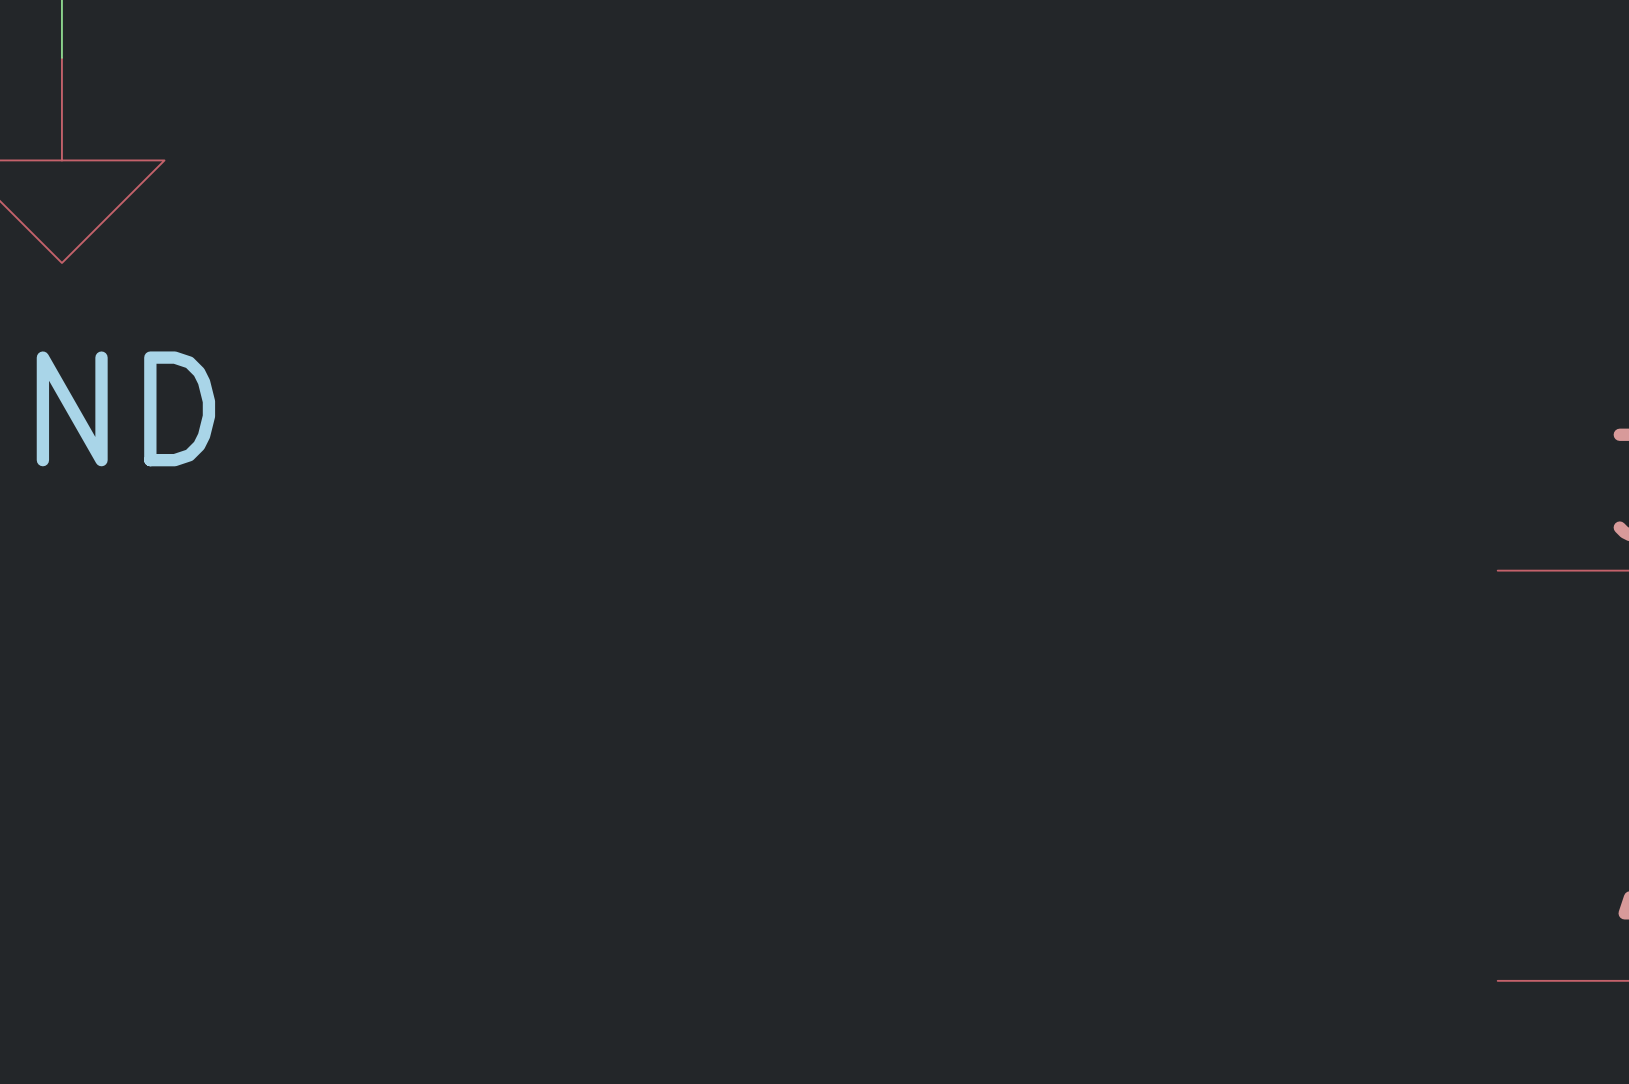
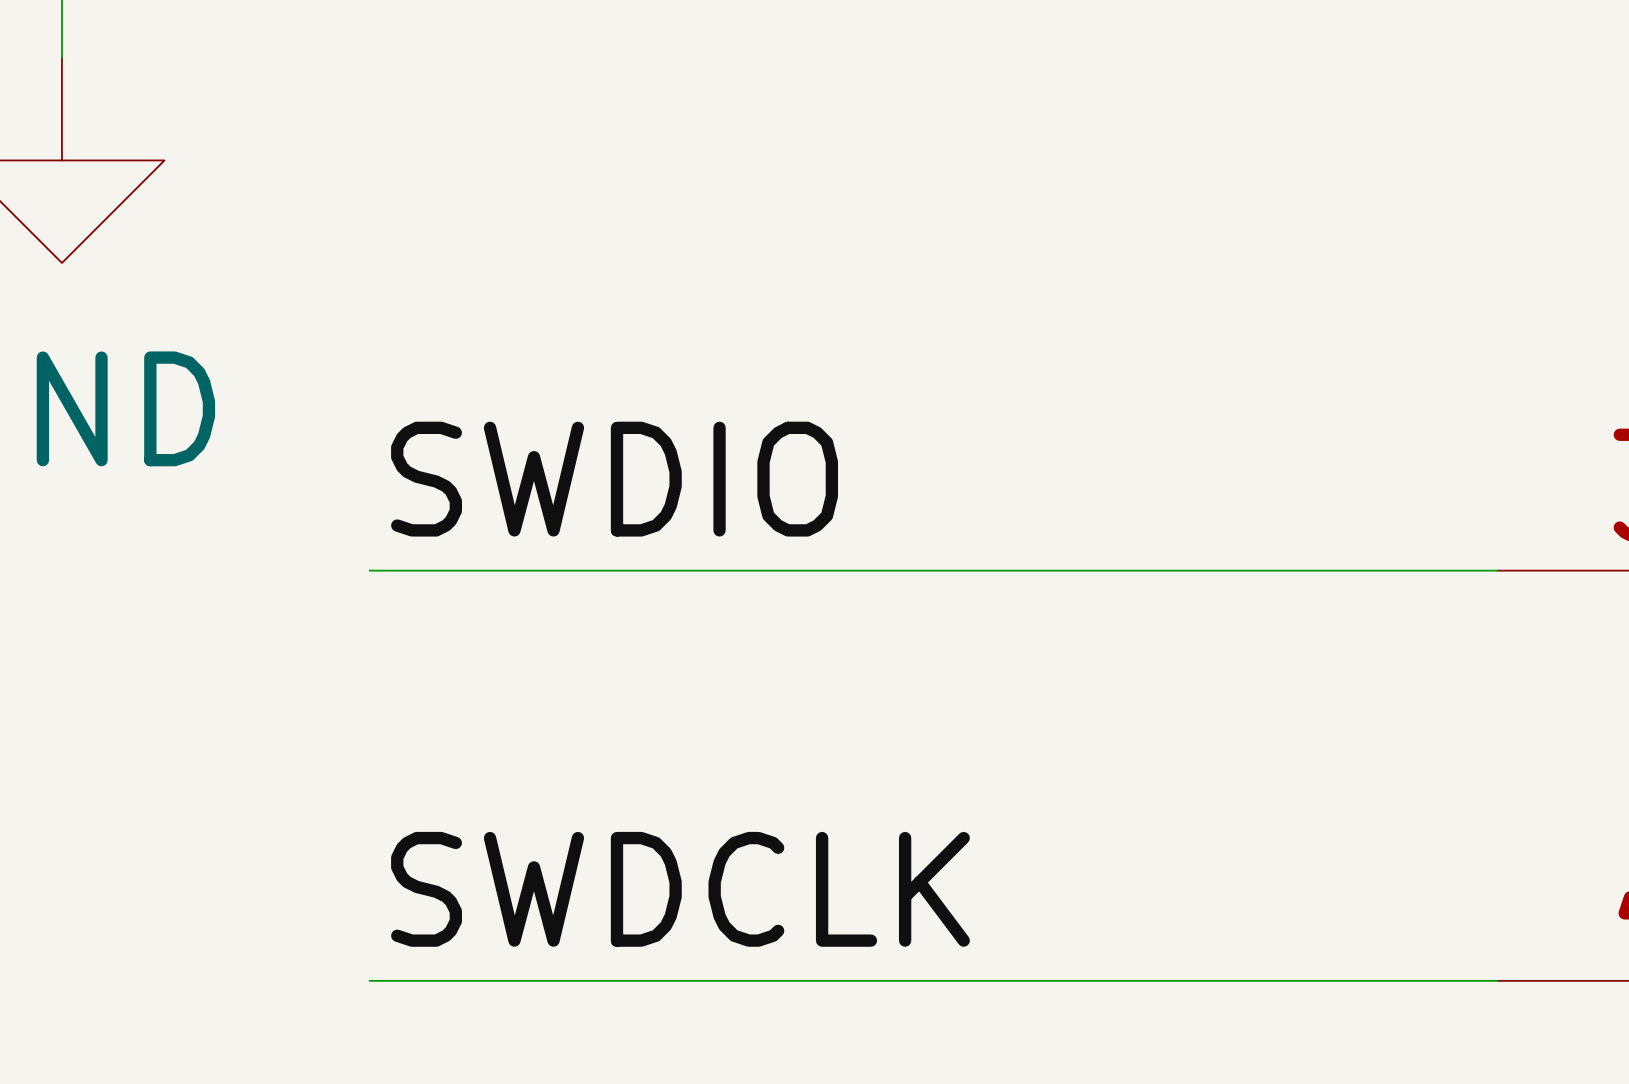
label: none -> SWDIO (614, 479)
wire: none -> (369, 570) (1497, 570)
label: none -> SWDCLK (680, 889)
wire: none -> (369, 980) (1497, 980)

